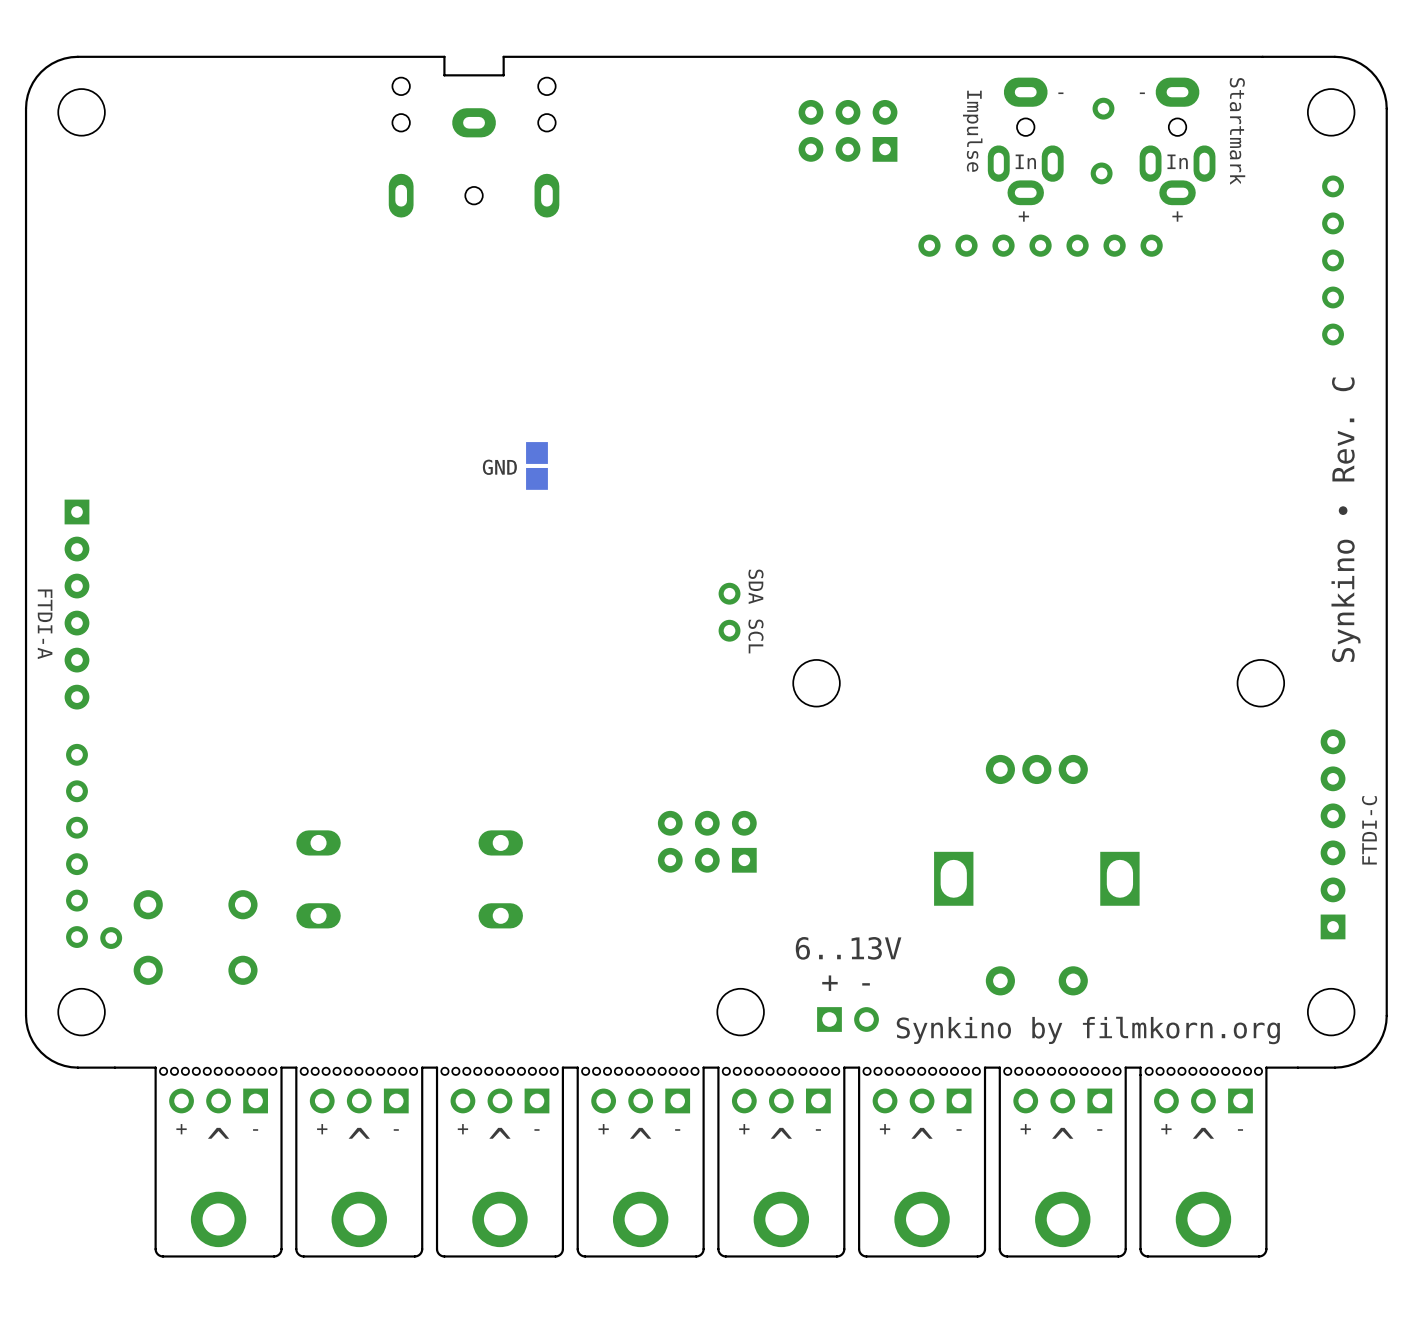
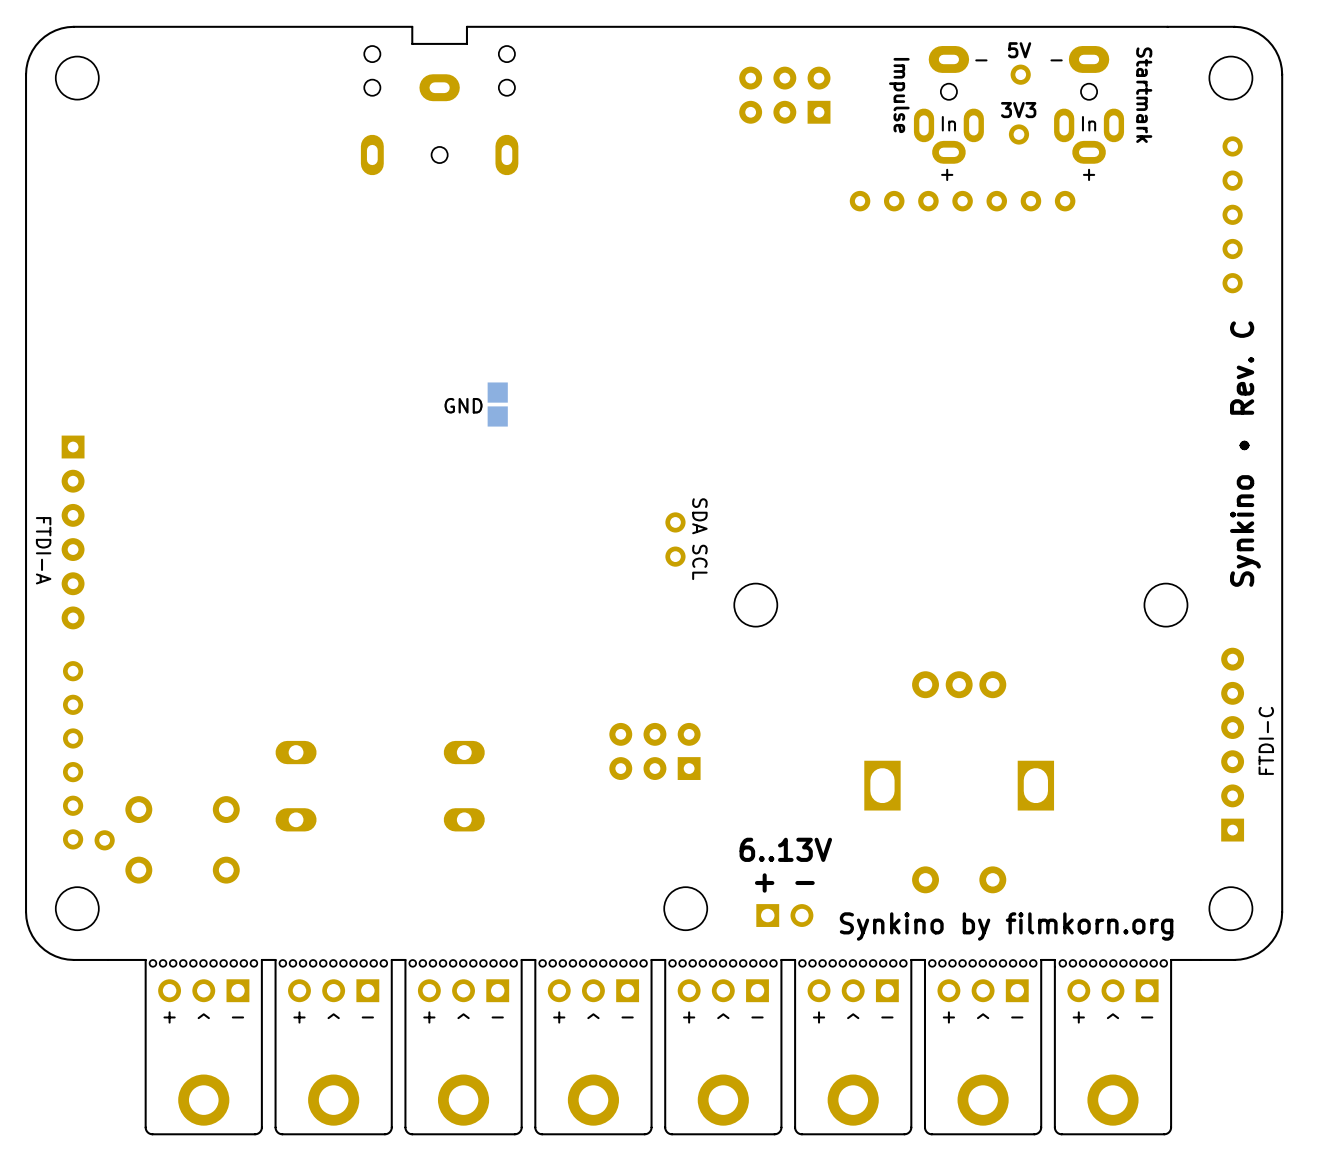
text: none -> 5V (1019, 50)
text: none -> 3V3 (1018, 110)

